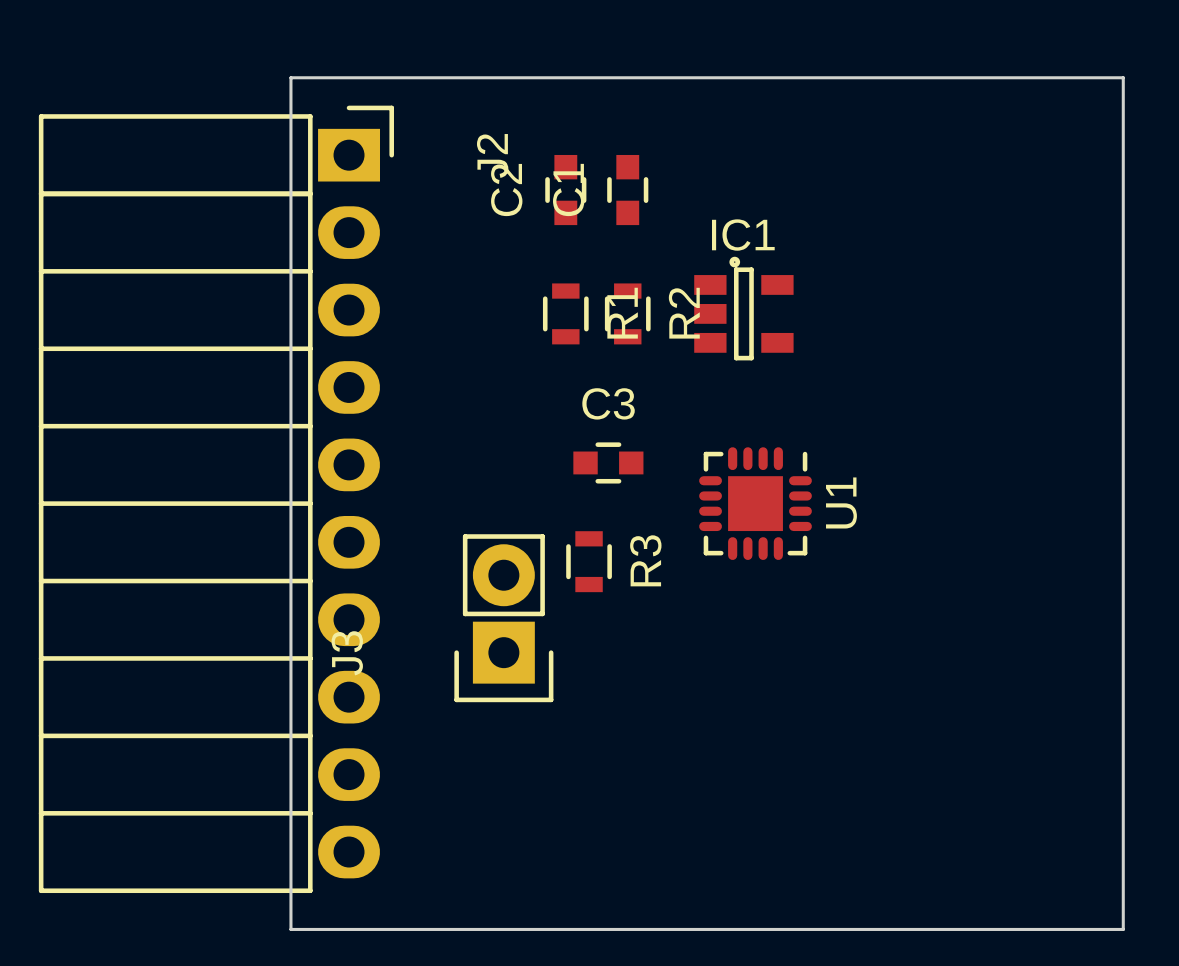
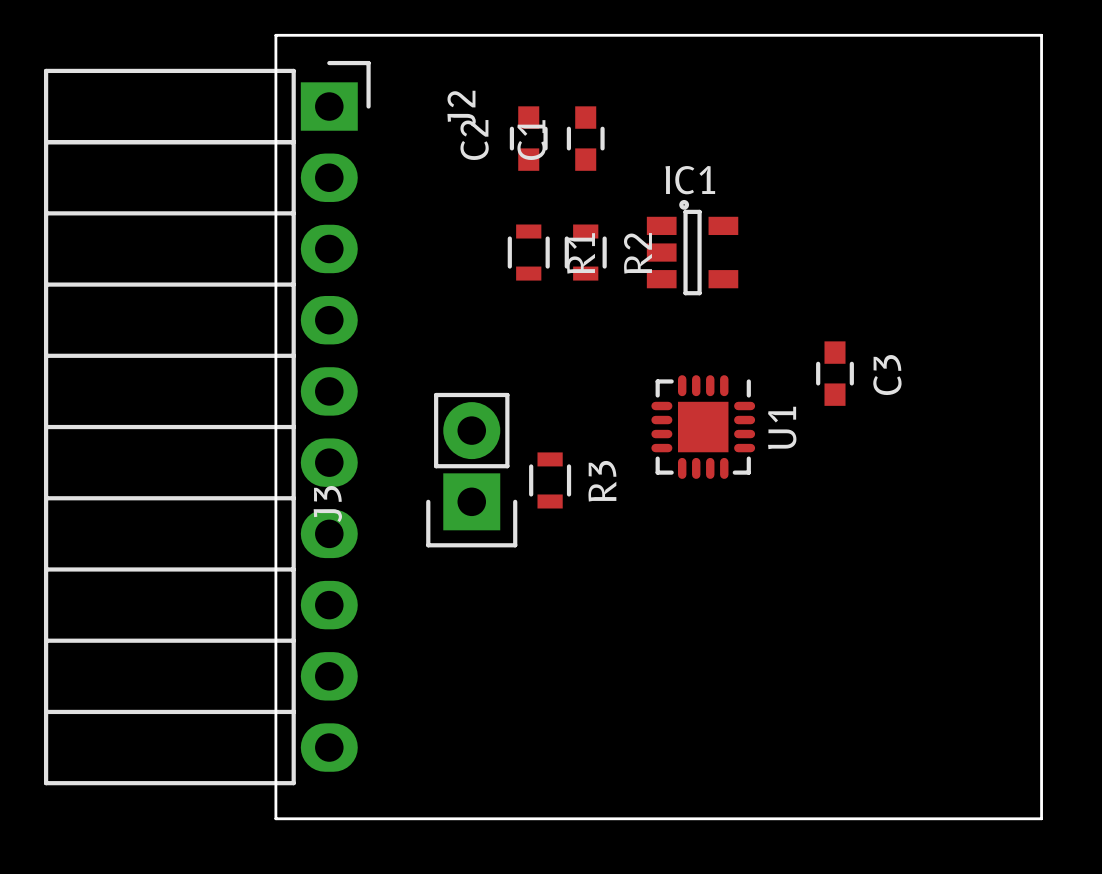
C3 rotation: 0° (608, 462) -> 90° clockwise (835, 373)
C3 position: (608, 462) -> (835, 373)
J3 position: (503, 618) -> (471, 470)

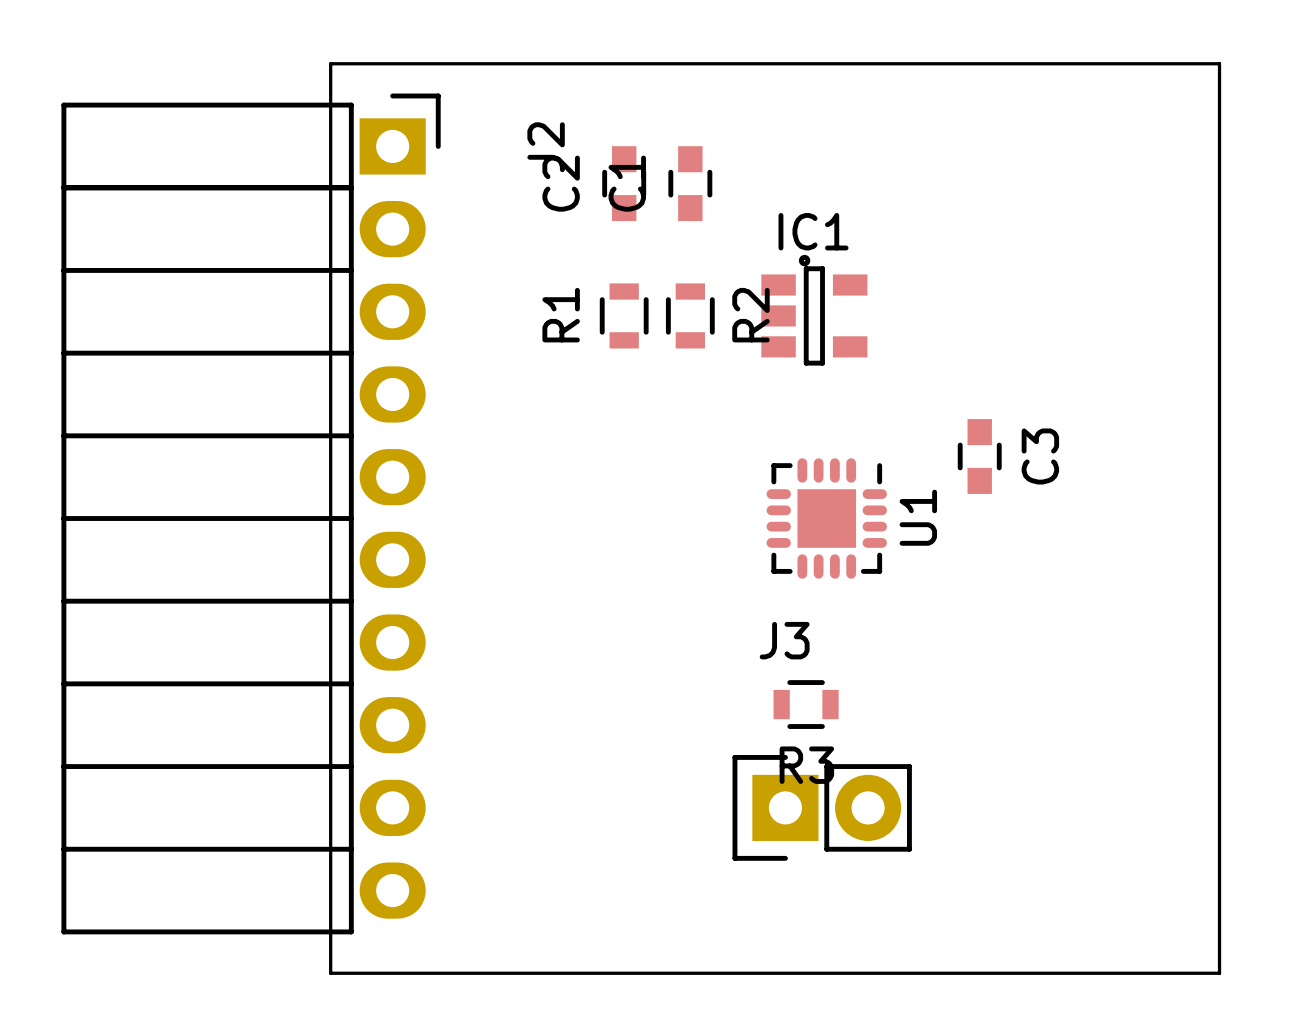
R1 name position: R1 (580, 253) -> R1 (561, 315)
J3 rotation: 0° (471, 470) -> 90° clockwise (822, 807)
J3 position: (471, 470) -> (822, 807)
R3 rotation: 0° (550, 480) -> 90° clockwise (806, 704)
R3 position: (550, 480) -> (806, 704)

